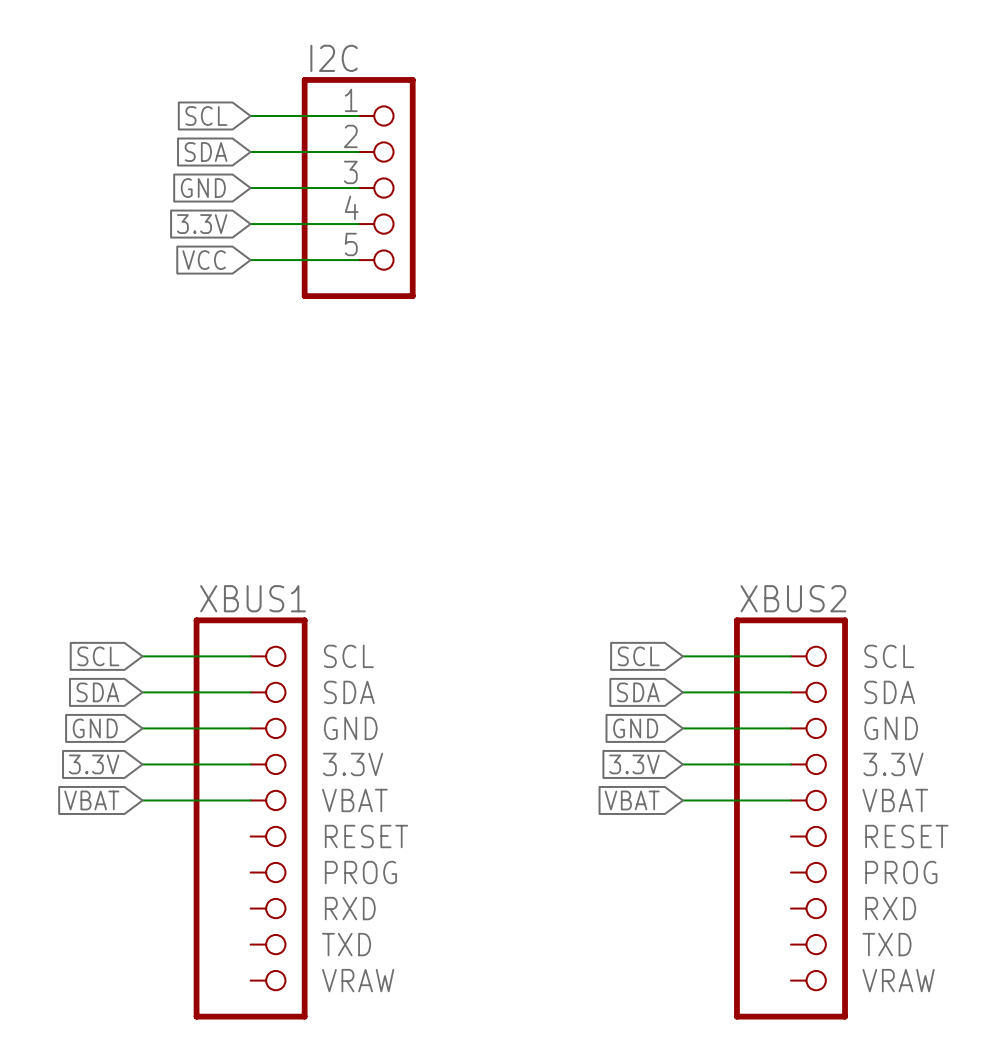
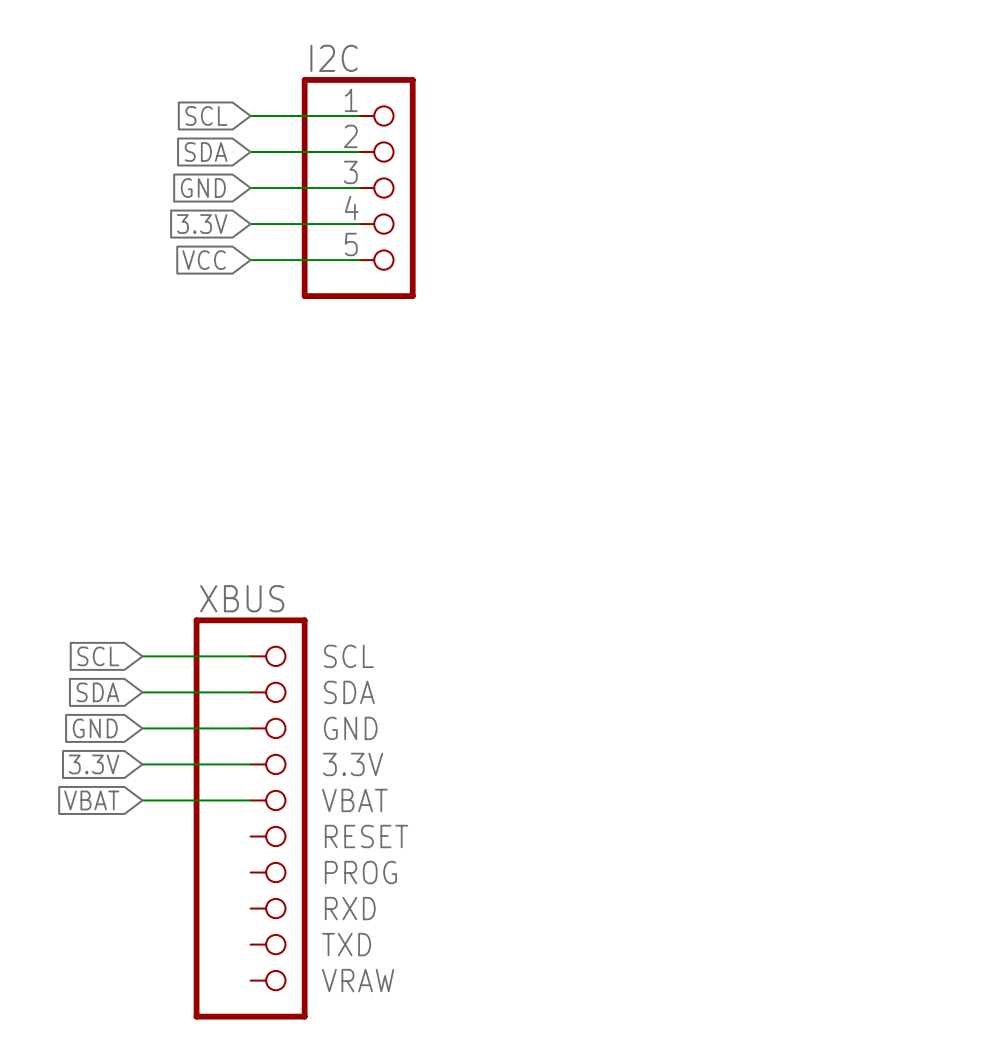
XBUS1 name: XBUS1 (253, 598) -> XBUS (242, 598)
global label: SCL (638, 656) -> none
wire: (682, 656) (790, 656) -> none
global label: SDA (638, 692) -> none
wire: (682, 692) (790, 692) -> none
global label: GND (635, 728) -> none
wire: (682, 728) (790, 728) -> none
global label: 3.3V (634, 764) -> none
wire: (682, 764) (790, 764) -> none
global label: VBAT (632, 800) -> none
wire: (682, 800) (790, 800) -> none
XBUS2: (790, 818) -> none

